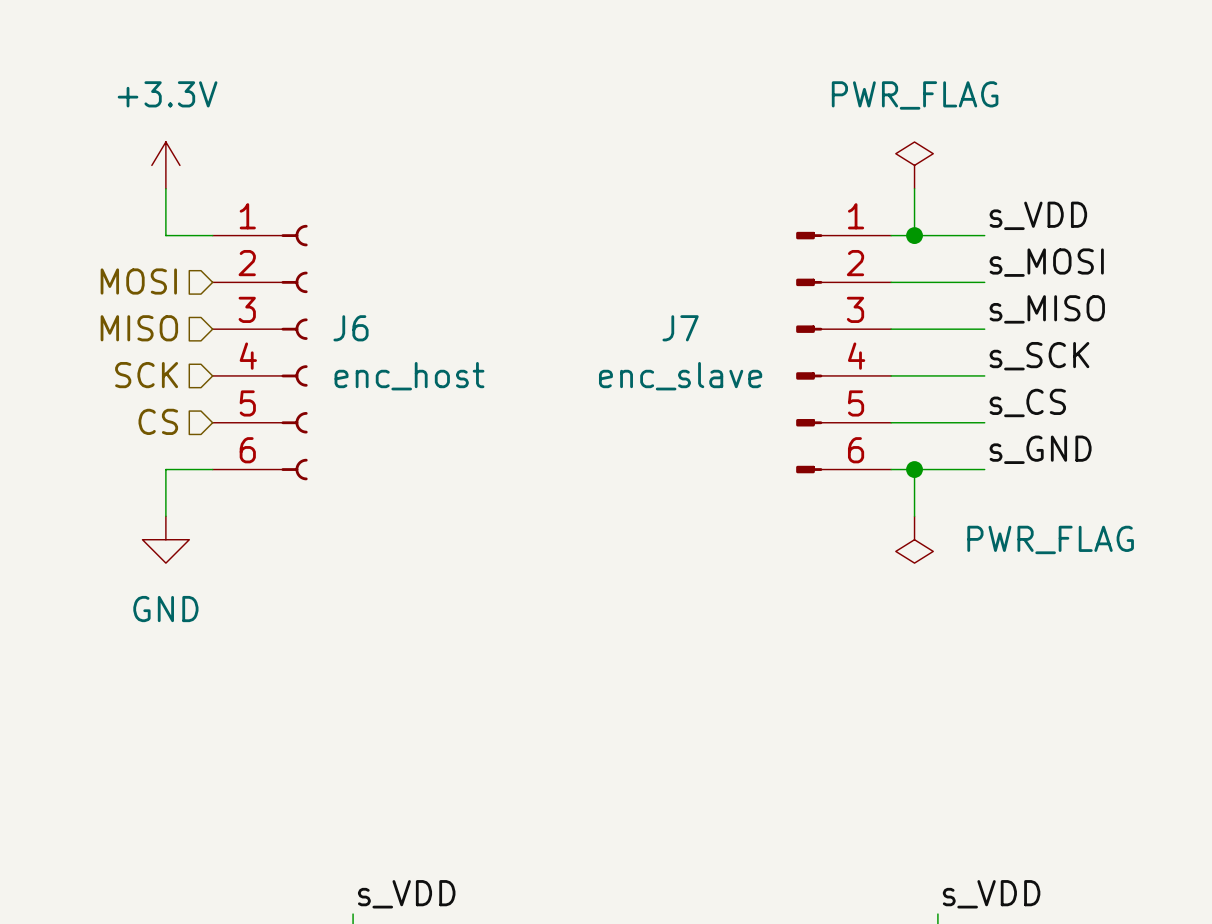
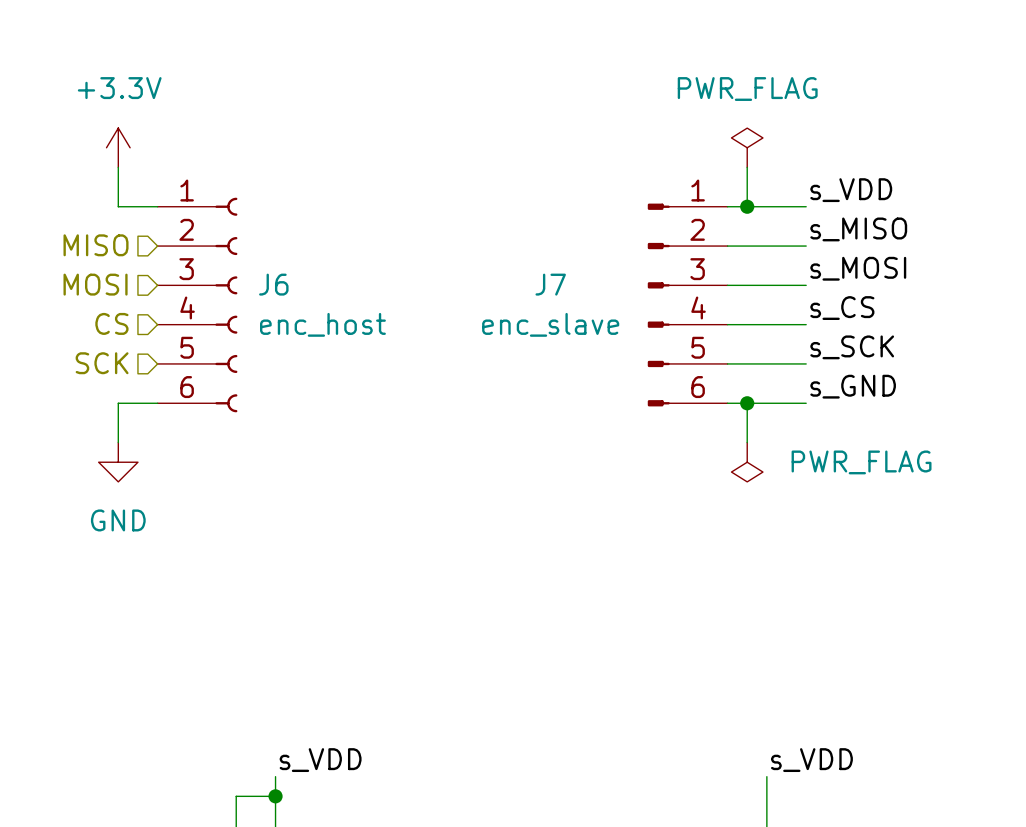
label: s_MOSI (1046, 262) -> s_MISO (858, 229)
hierarchical label: MOSI (138, 281) -> MISO (96, 245)
label: s_MISO (1047, 309) -> s_MOSI (858, 268)
hierarchical label: MISO (139, 328) -> MOSI (95, 284)
label: s_SCK (1039, 356) -> s_CS (842, 308)
hierarchical label: SCK (146, 375) -> CS (111, 323)
label: s_CS (1027, 402) -> s_SCK (852, 347)
hierarchical label: CS (158, 421) -> SCK (102, 363)

